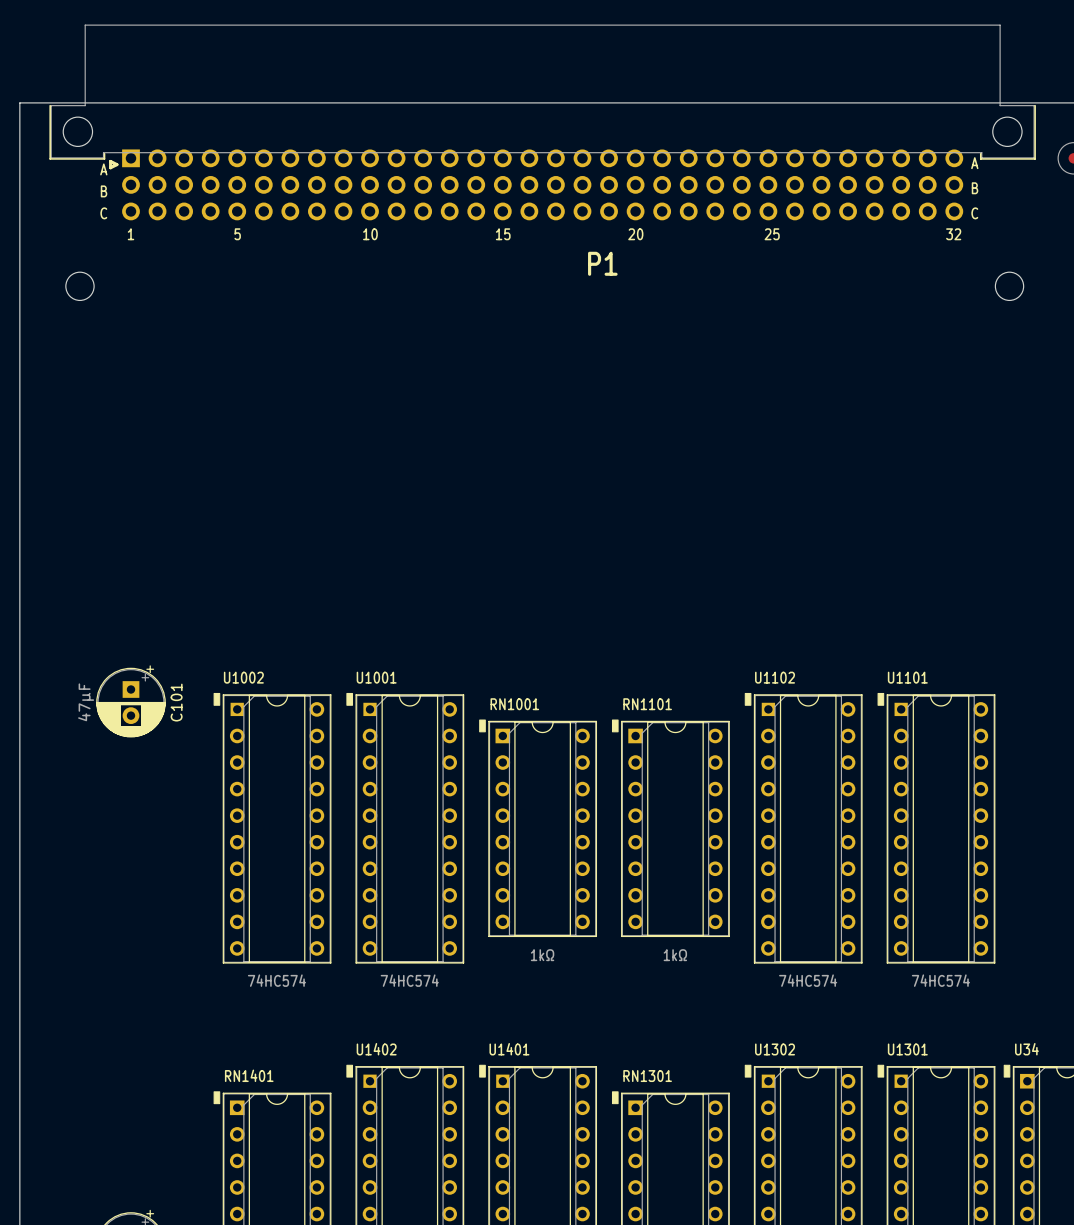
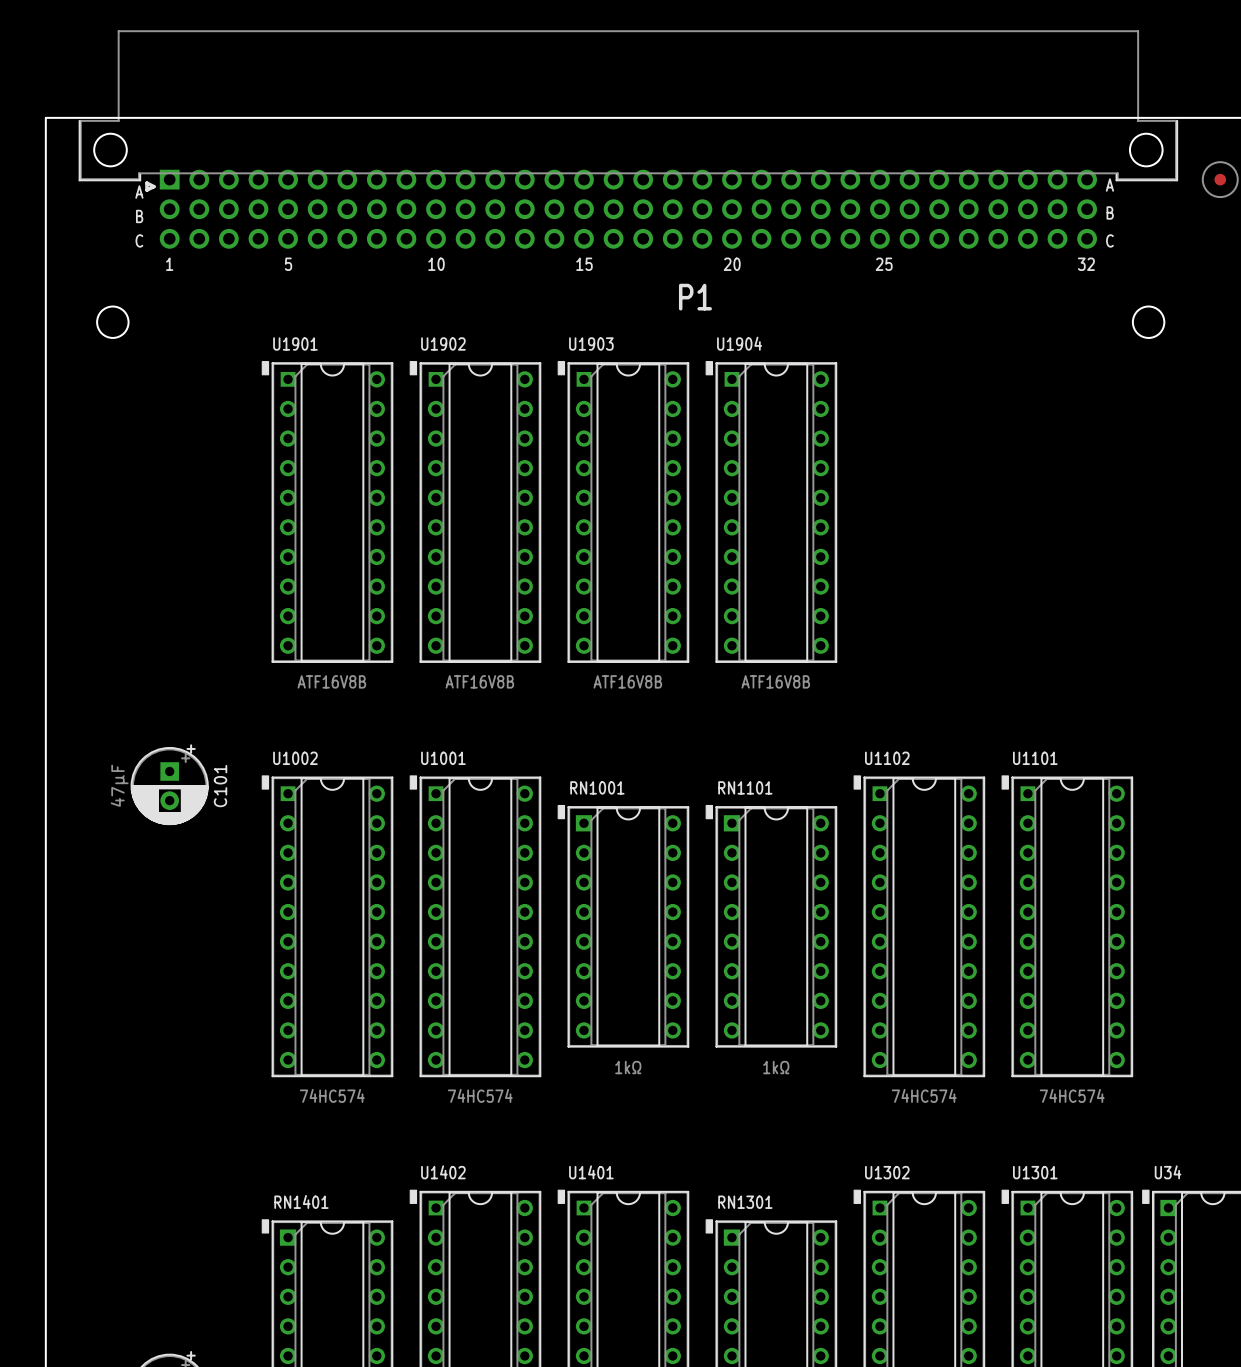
U1901: none -> ATF16V8B (327, 511)
U1902: none -> ATF16V8B (475, 511)
U1903: none -> ATF16V8B (623, 511)
U1904: none -> ATF16V8B (771, 511)

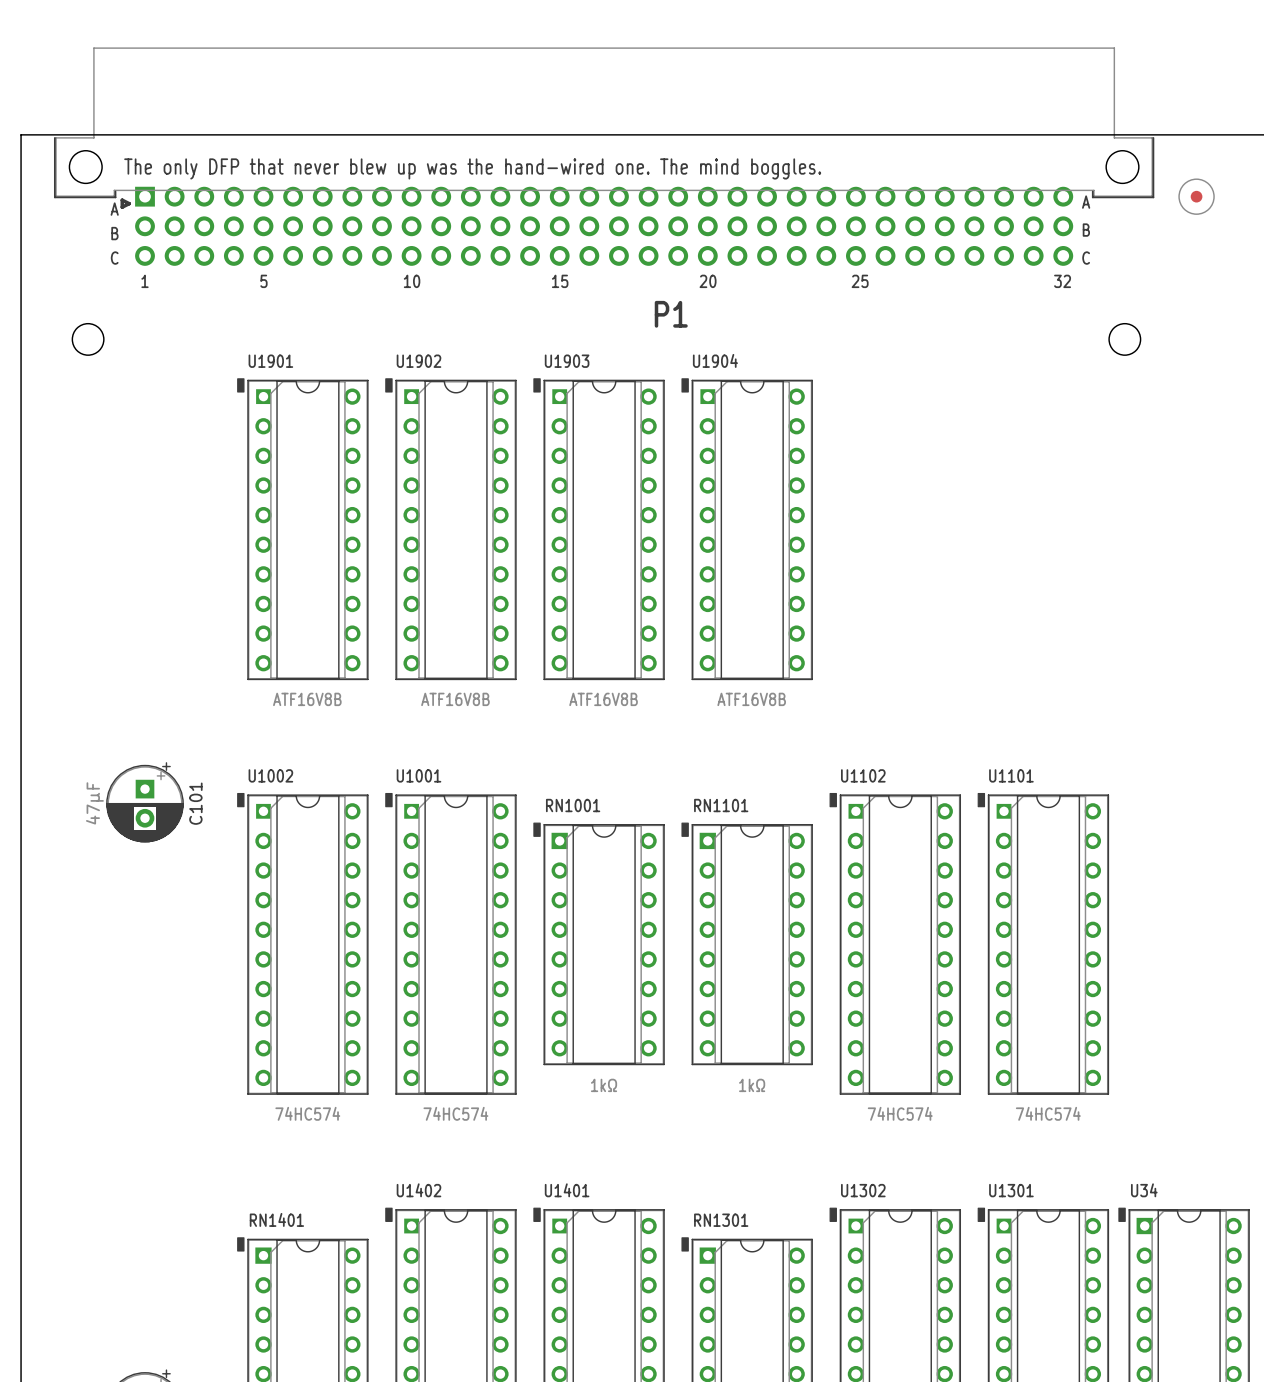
text: none -> The only DFP that never blew up was the hand-wired one. The mind boggles. (472, 168)

